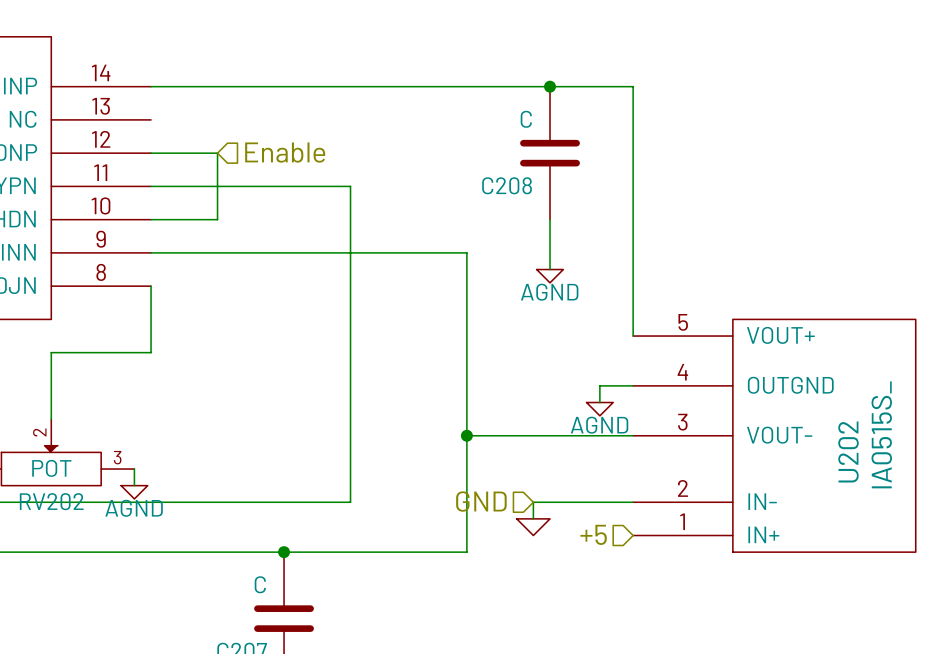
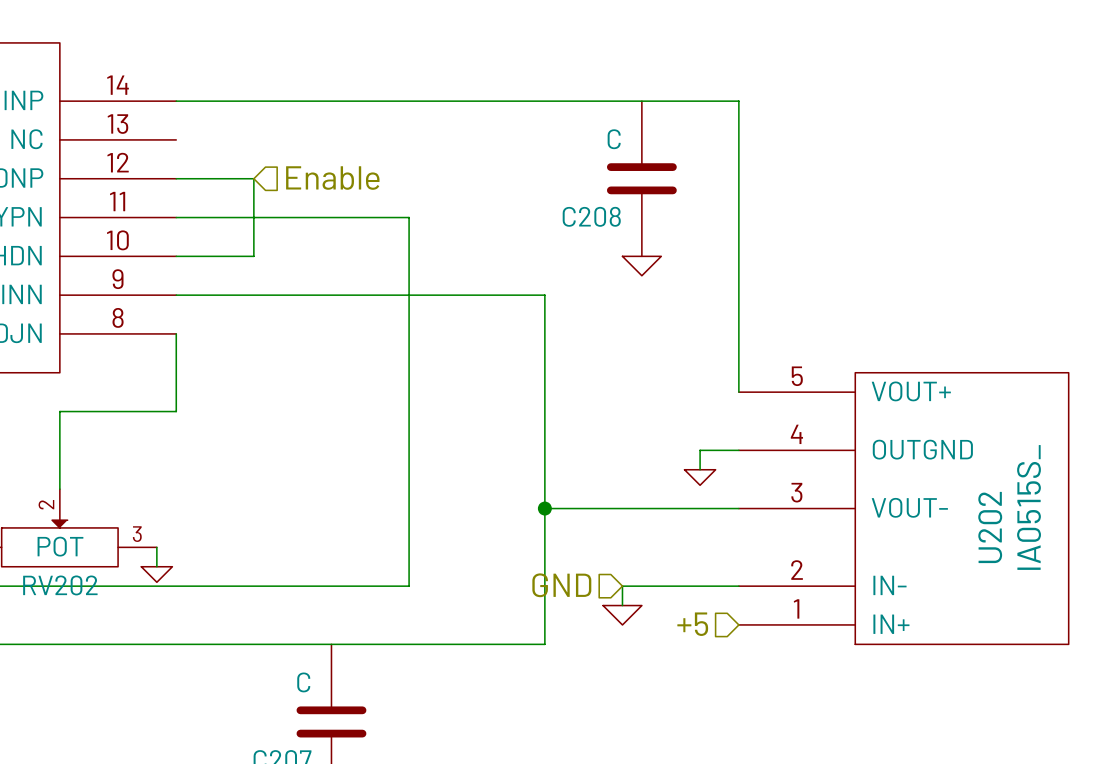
junction: (550, 86) -> none
wire: (550, 219) (550, 269) -> none
power symbol: none -> (641, 266)
power symbol: AGND (550, 276) -> none
power symbol text: AGND (599, 425) -> none
power symbol text: AGND (134, 508) -> none
junction: (284, 552) -> none

